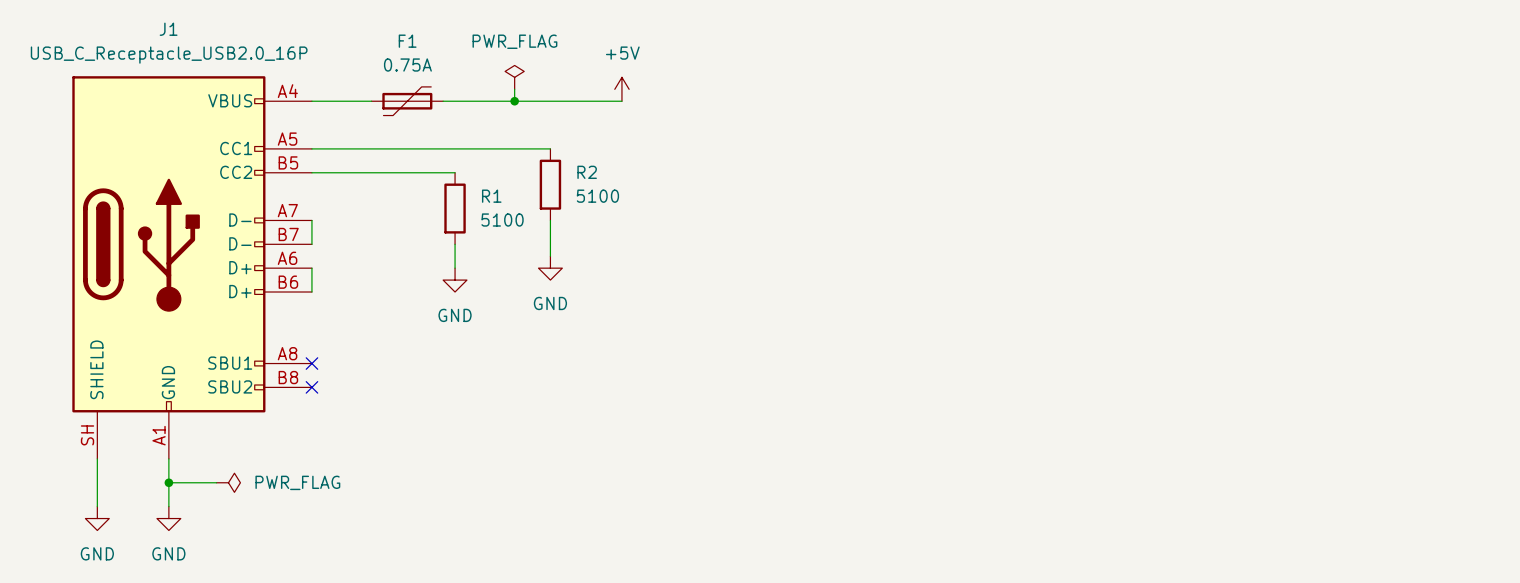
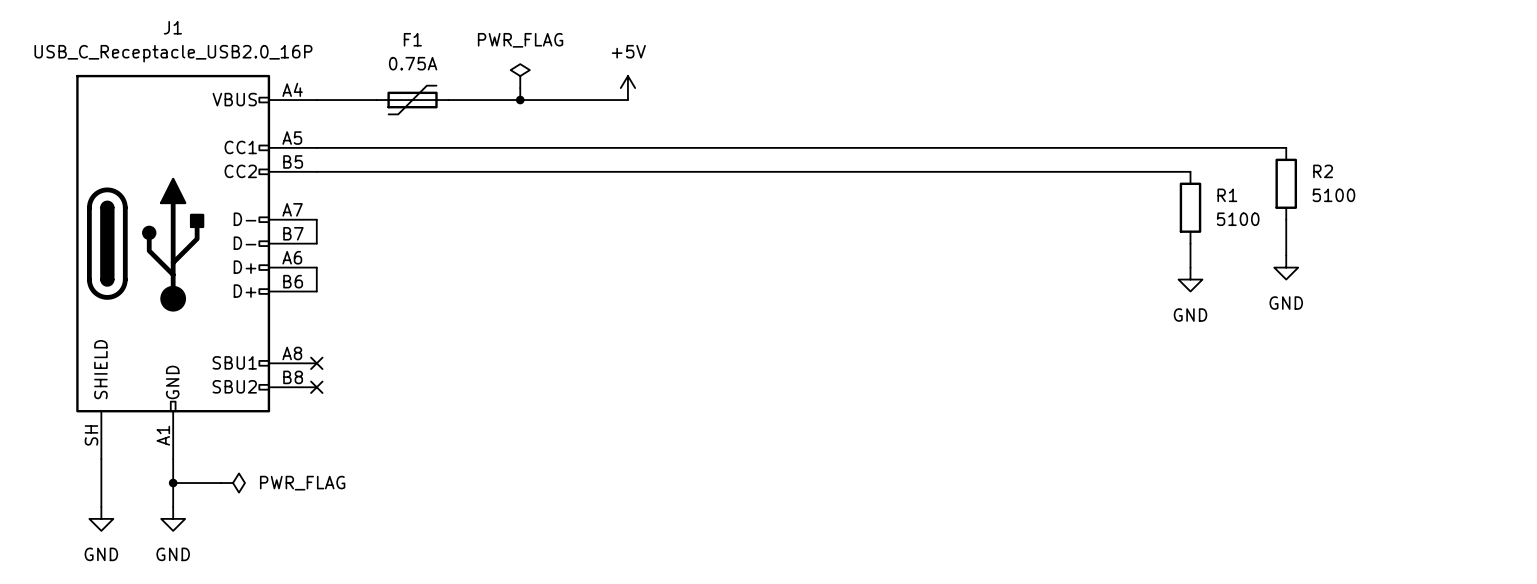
wire: none -> (556, 147) (1286, 147)
wire: none -> (460, 171) (1190, 171)
R2 position: (550, 184) -> (1286, 183)
R1 position: (455, 208) -> (1190, 207)
wire: (550, 220) (550, 256) -> none
wire: none -> (1286, 219) (1286, 255)
wire: (455, 244) (455, 268) -> none
wire: none -> (1190, 243) (1190, 267)
power symbol: GND (550, 268) -> none
power symbol: none -> GND (1286, 267)
power symbol: GND (455, 280) -> none
power symbol: none -> GND (1190, 279)

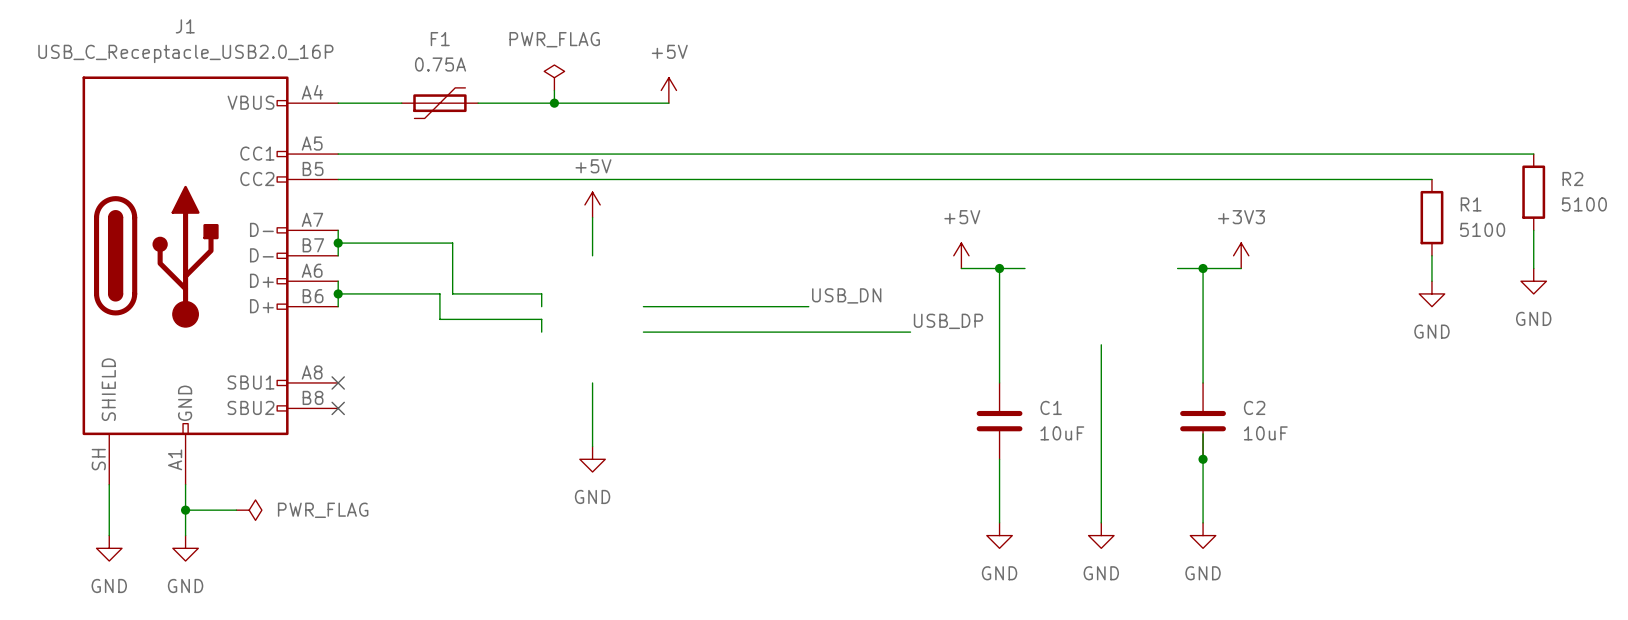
wire: none -> (1368, 154) (1533, 154)
wire: none -> (1266, 179) (1431, 179)
R2 position: (1286, 183) -> (1533, 192)
power symbol: none -> +5V (592, 204)
wire: none -> (592, 217) (592, 255)
R1 position: (1190, 207) -> (1431, 217)
wire: (1286, 219) (1286, 255) -> (1533, 230) (1533, 268)
wire: none -> (338, 243) (452, 243) (452, 293) (541, 293) (541, 306)
junction: none -> (338, 243)
power symbol: none -> +5V (961, 255)
power symbol: none -> +3V3 (1241, 255)
wire: (1190, 243) (1190, 267) -> (1431, 255) (1431, 281)
wire: none -> (961, 268) (1024, 268)
wire: none -> (999, 268) (999, 382)
junction: none -> (999, 268)
wire: none -> (1177, 268) (1241, 268)
wire: none -> (1203, 268) (1203, 382)
junction: none -> (1203, 268)
power symbol position: GND (1286, 267) -> GND (1431, 293)
power symbol: none -> GND (1533, 281)
wire: none -> (338, 293) (439, 293) (439, 319) (541, 319) (541, 332)
junction: none -> (338, 293)
power symbol: GND (1190, 279) -> none
label: none -> USB_DN (846, 295)
wire: none -> (643, 306) (808, 306)
label: none -> USB_DP (948, 321)
wire: none -> (643, 332) (910, 332)
wire: none -> (1101, 344) (1101, 522)
wire: none -> (592, 382) (592, 446)
C1: none -> 10uF (999, 421)
C2: none -> 10uF (1203, 421)
wire: none -> (1203, 433) (1203, 522)
power symbol: none -> GND (592, 459)
wire: none -> (999, 459) (999, 522)
junction: none -> (1203, 459)
power symbol: none -> GND (999, 535)
power symbol: none -> GND (1101, 535)
power symbol: none -> GND (1203, 535)

